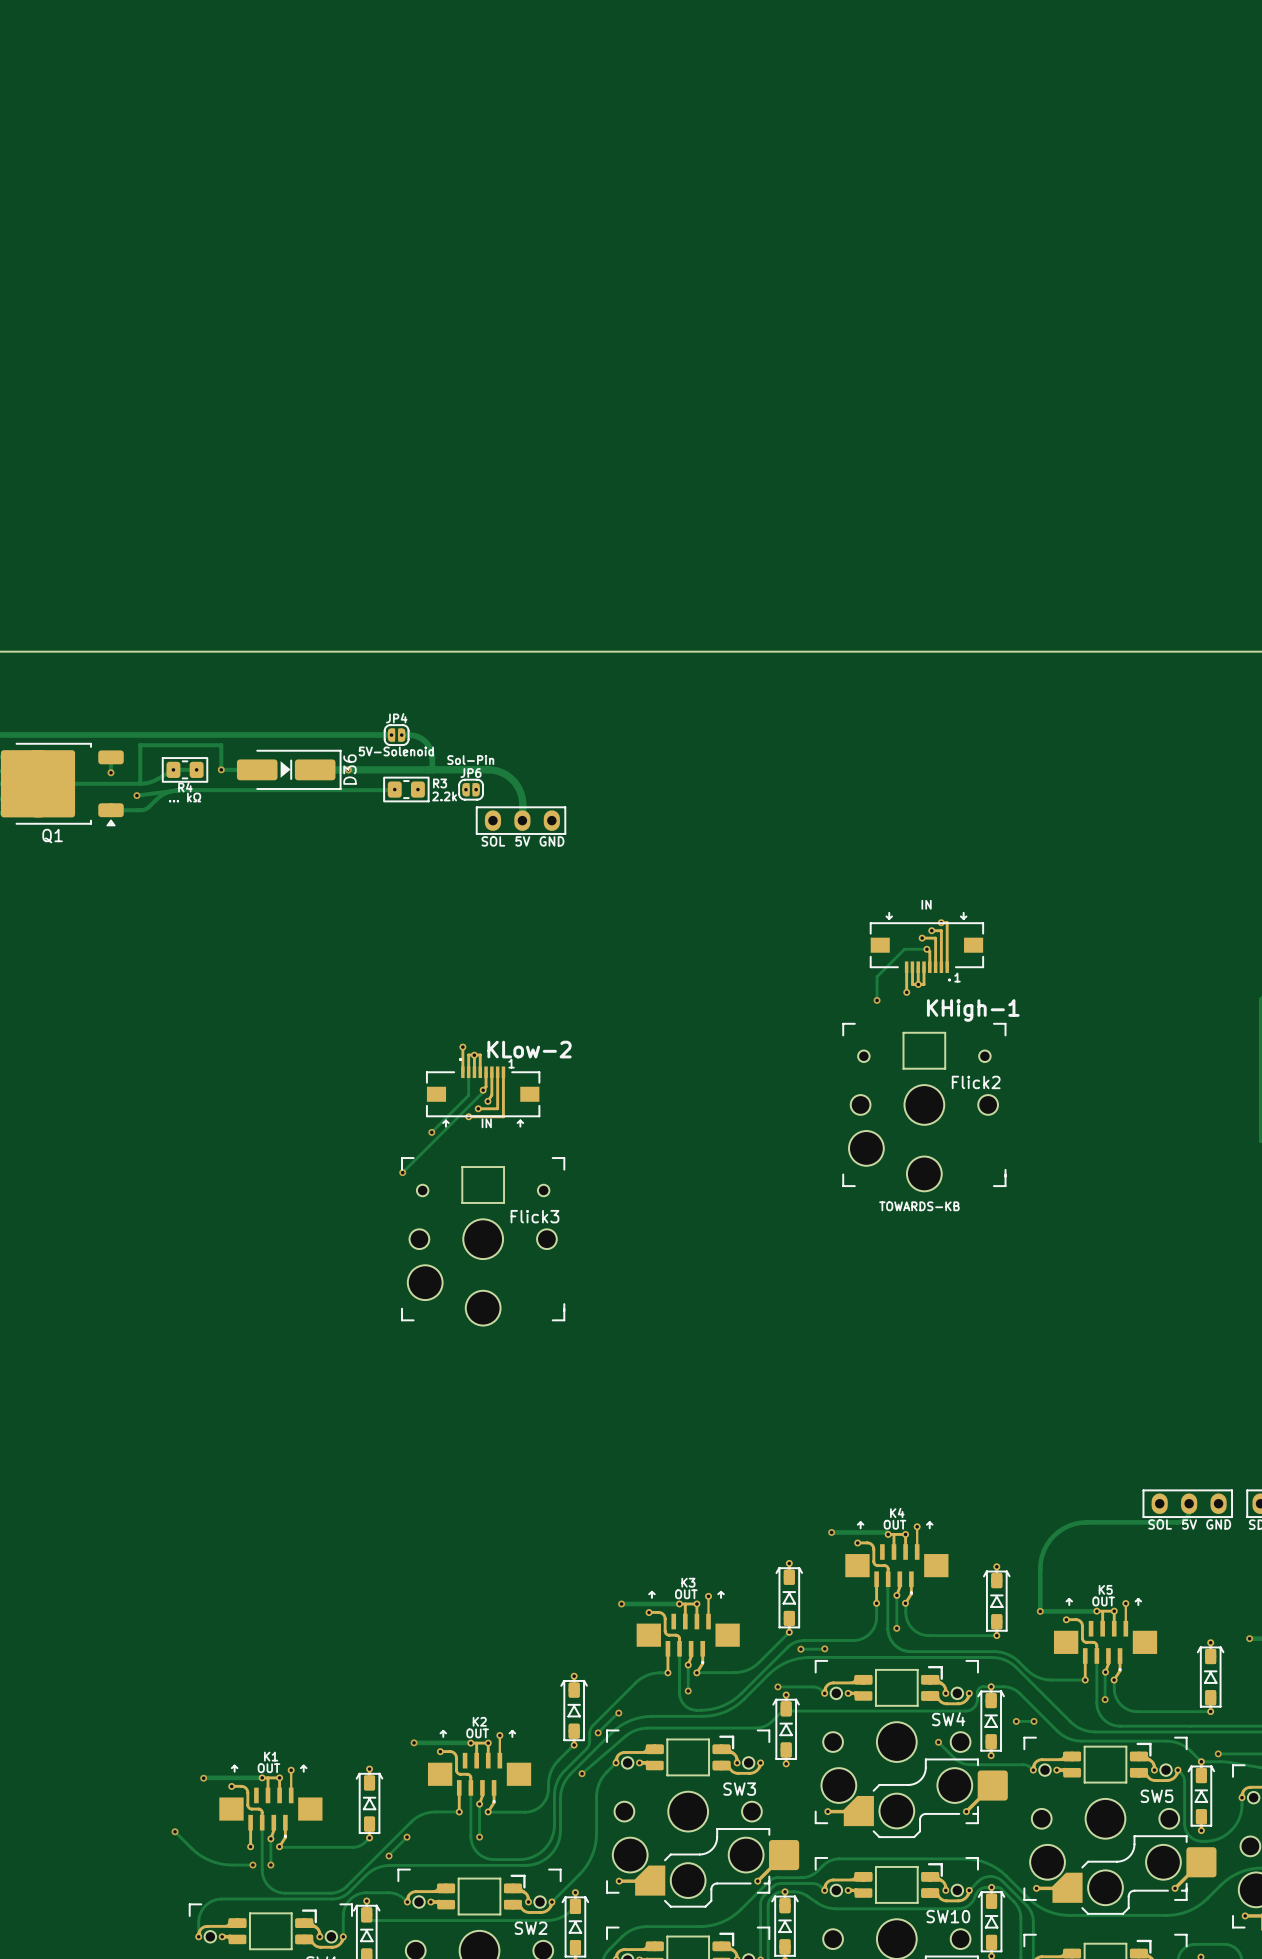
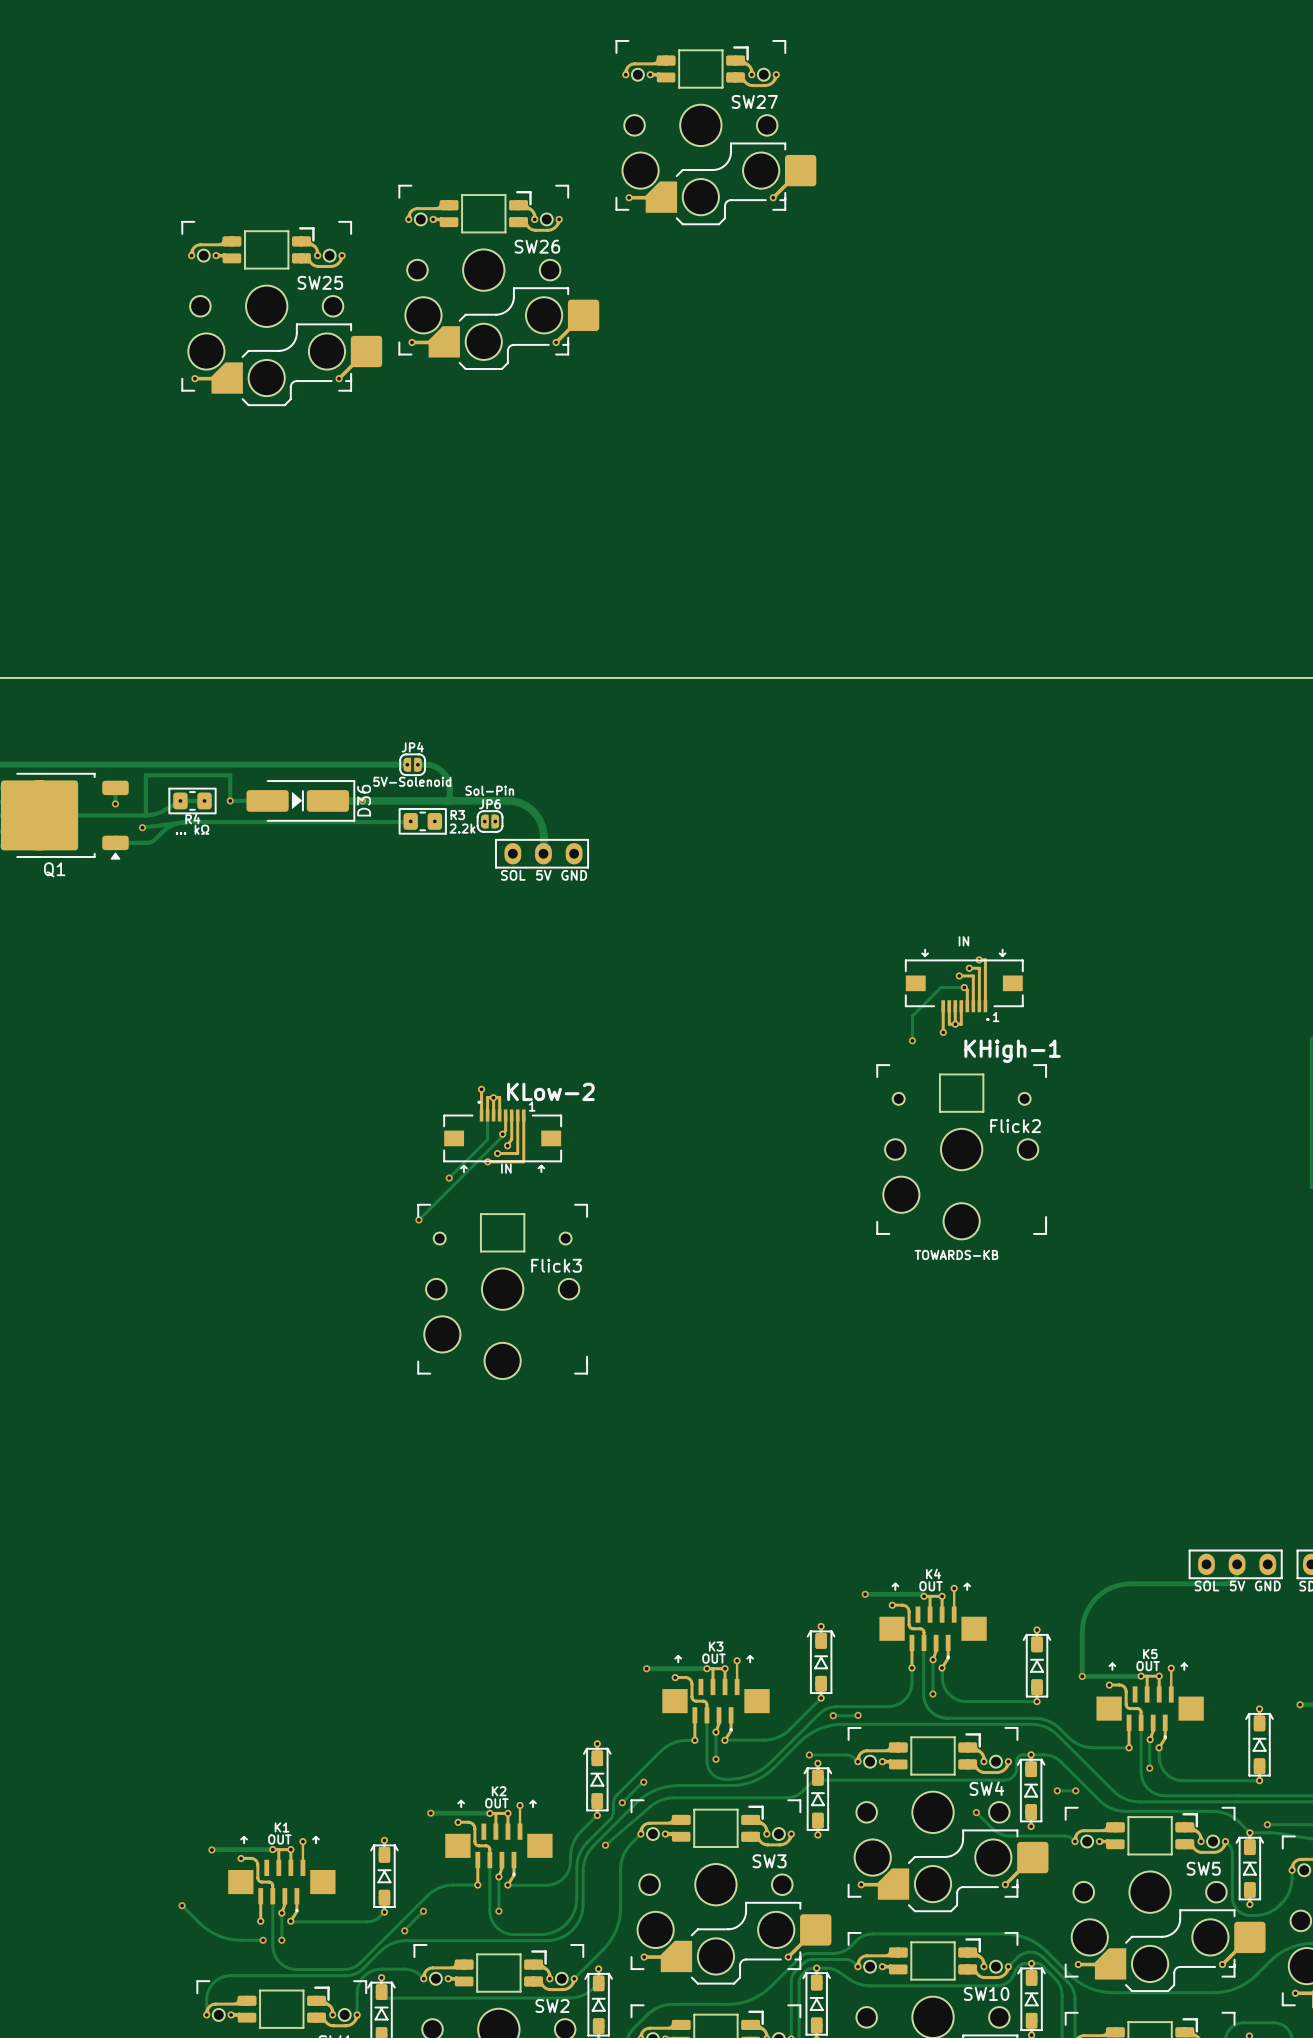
SW27: none -> (715, 132)
SW26: none -> (498, 277)
SW25: none -> (281, 313)

